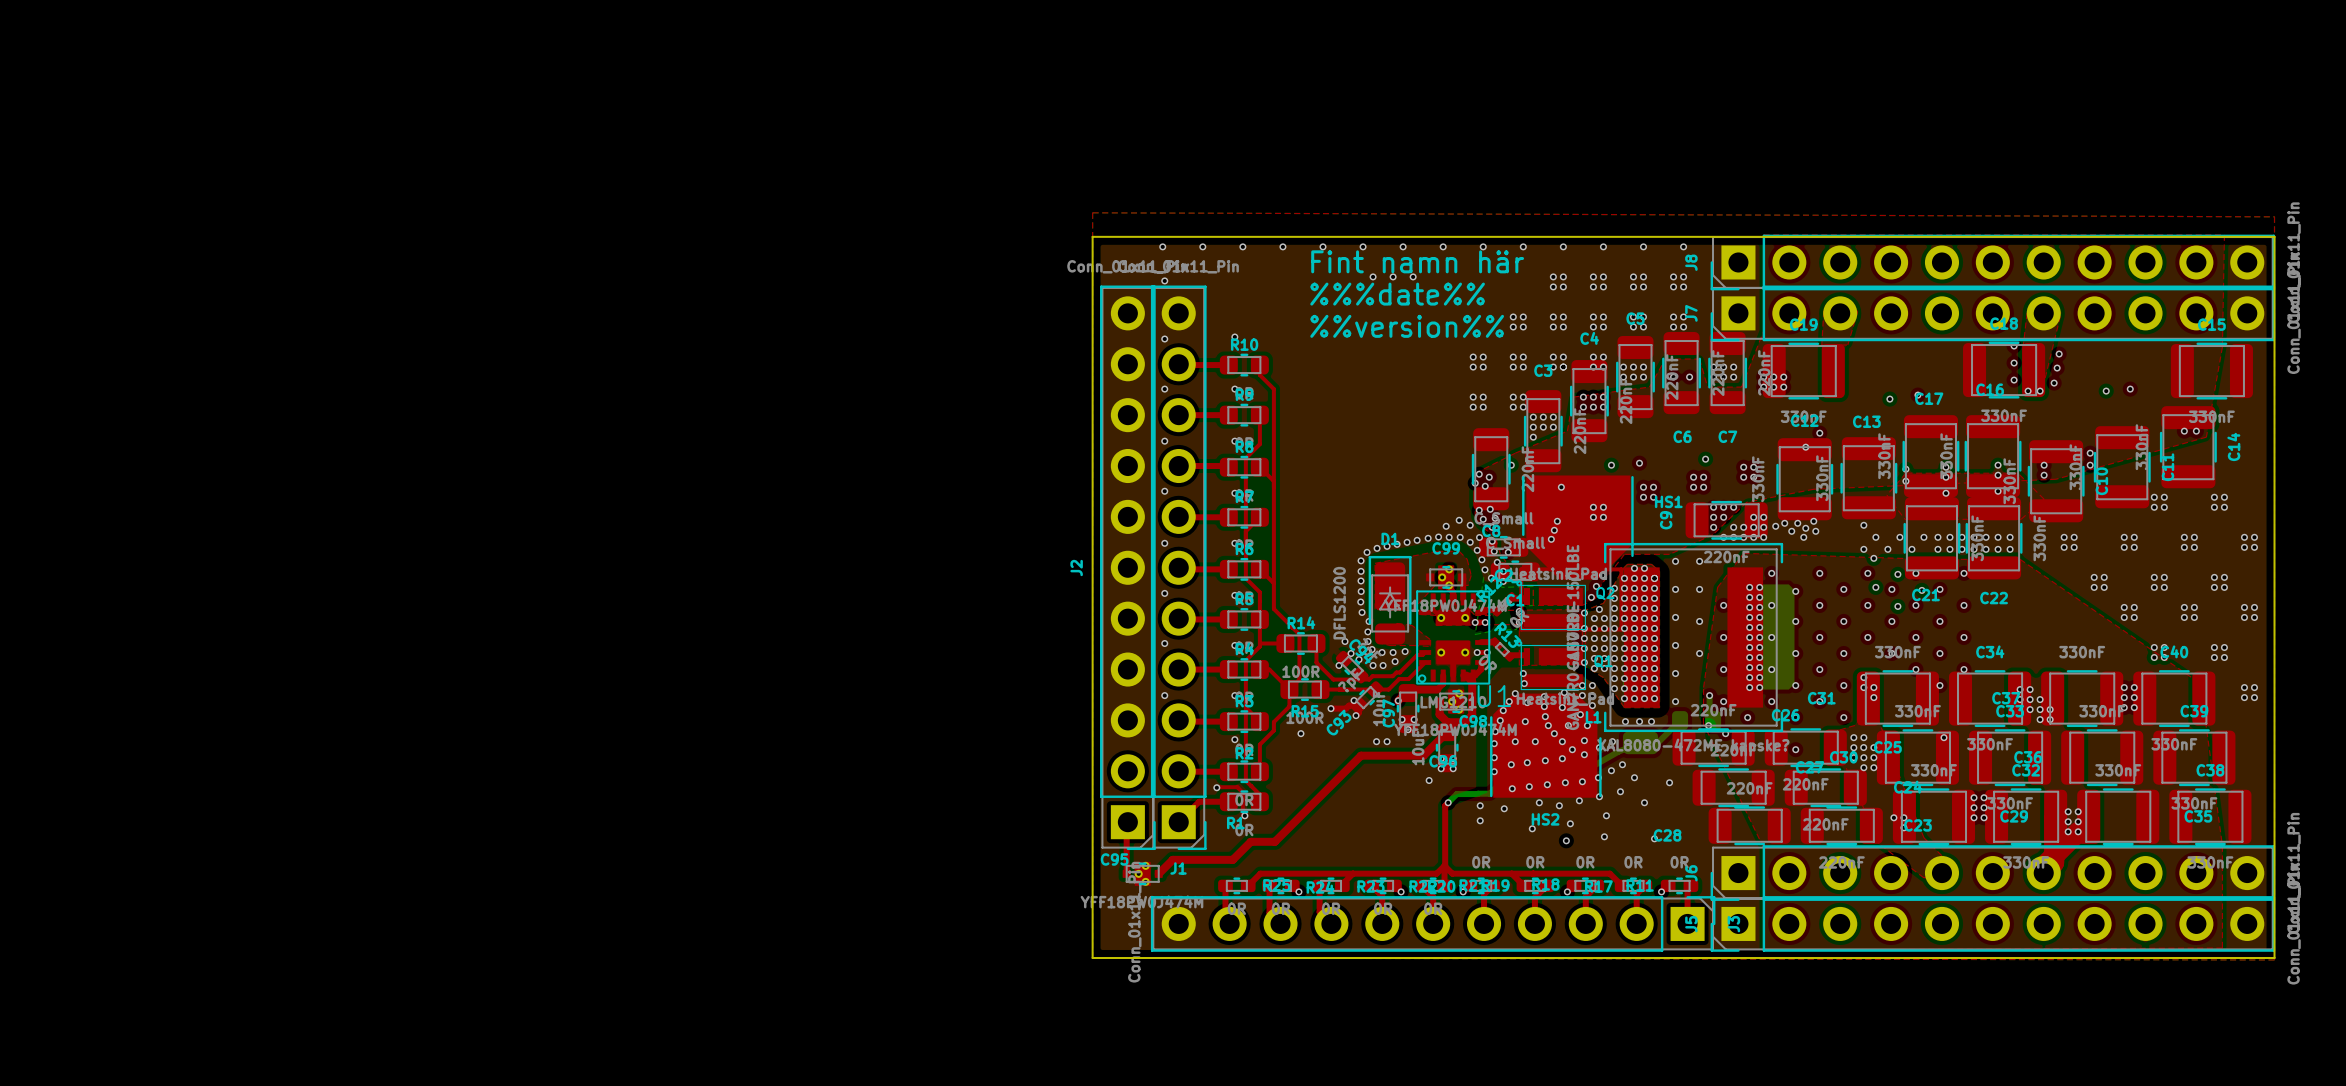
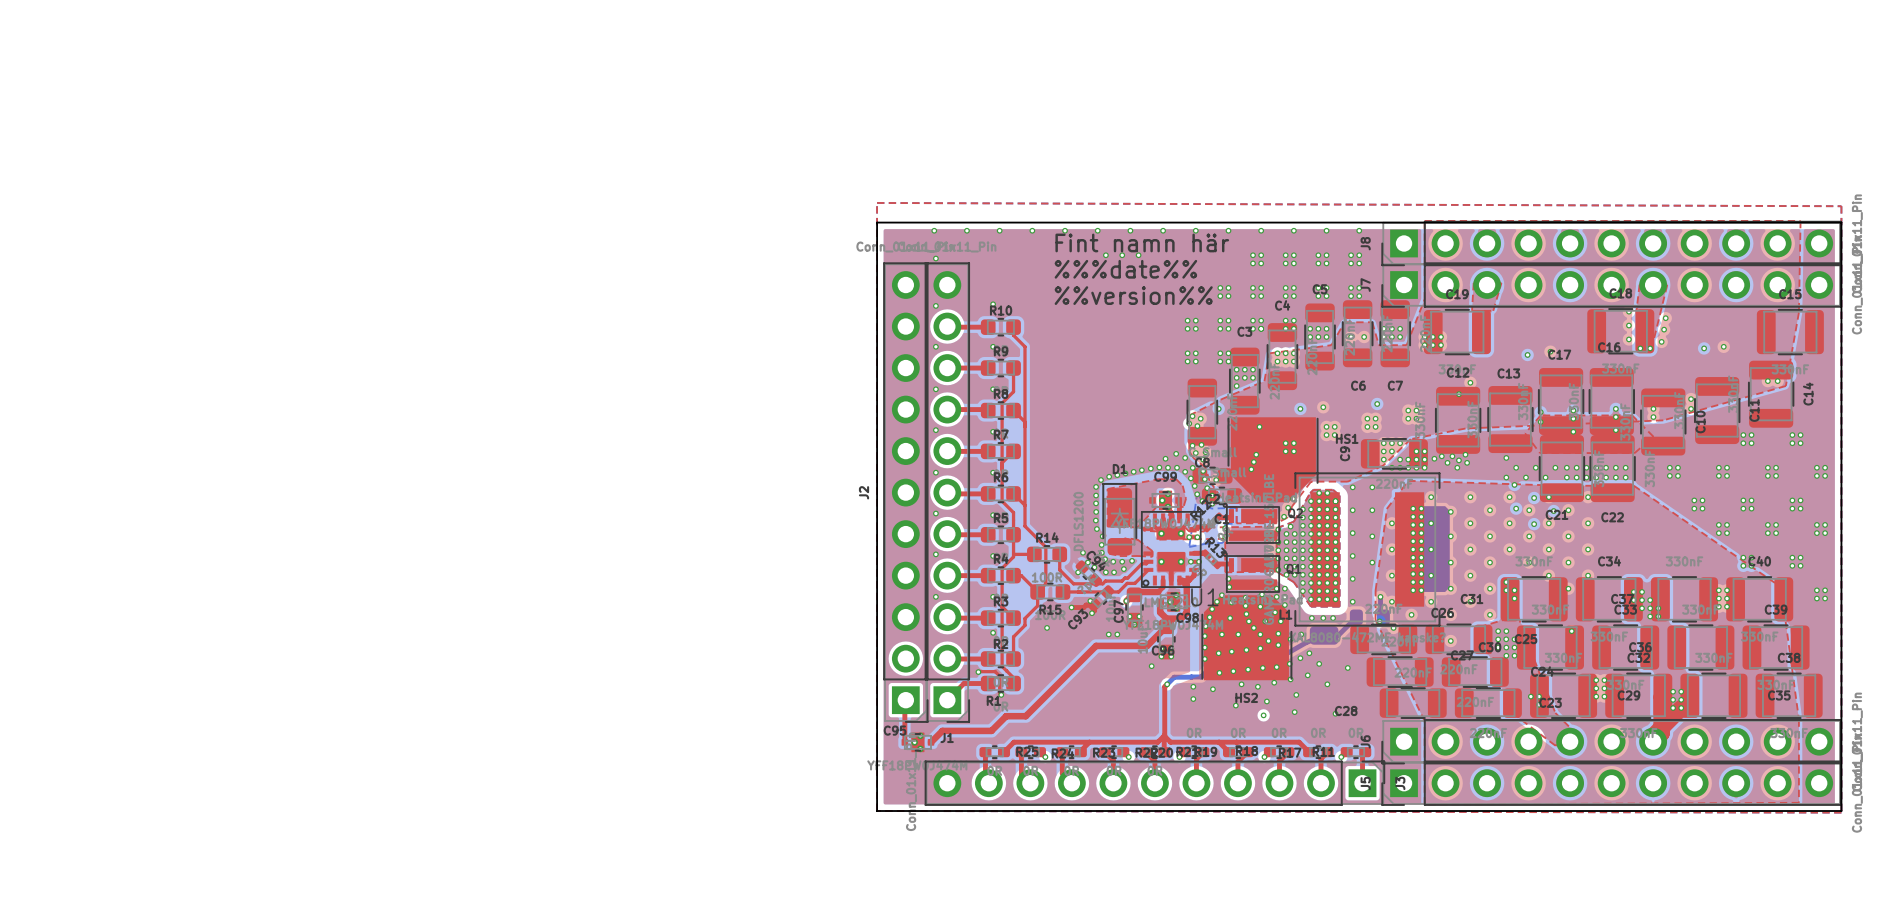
top track: (1521, 569) (1621, 569) (1621, 629) (1521, 629) (1521, 569) -> none

